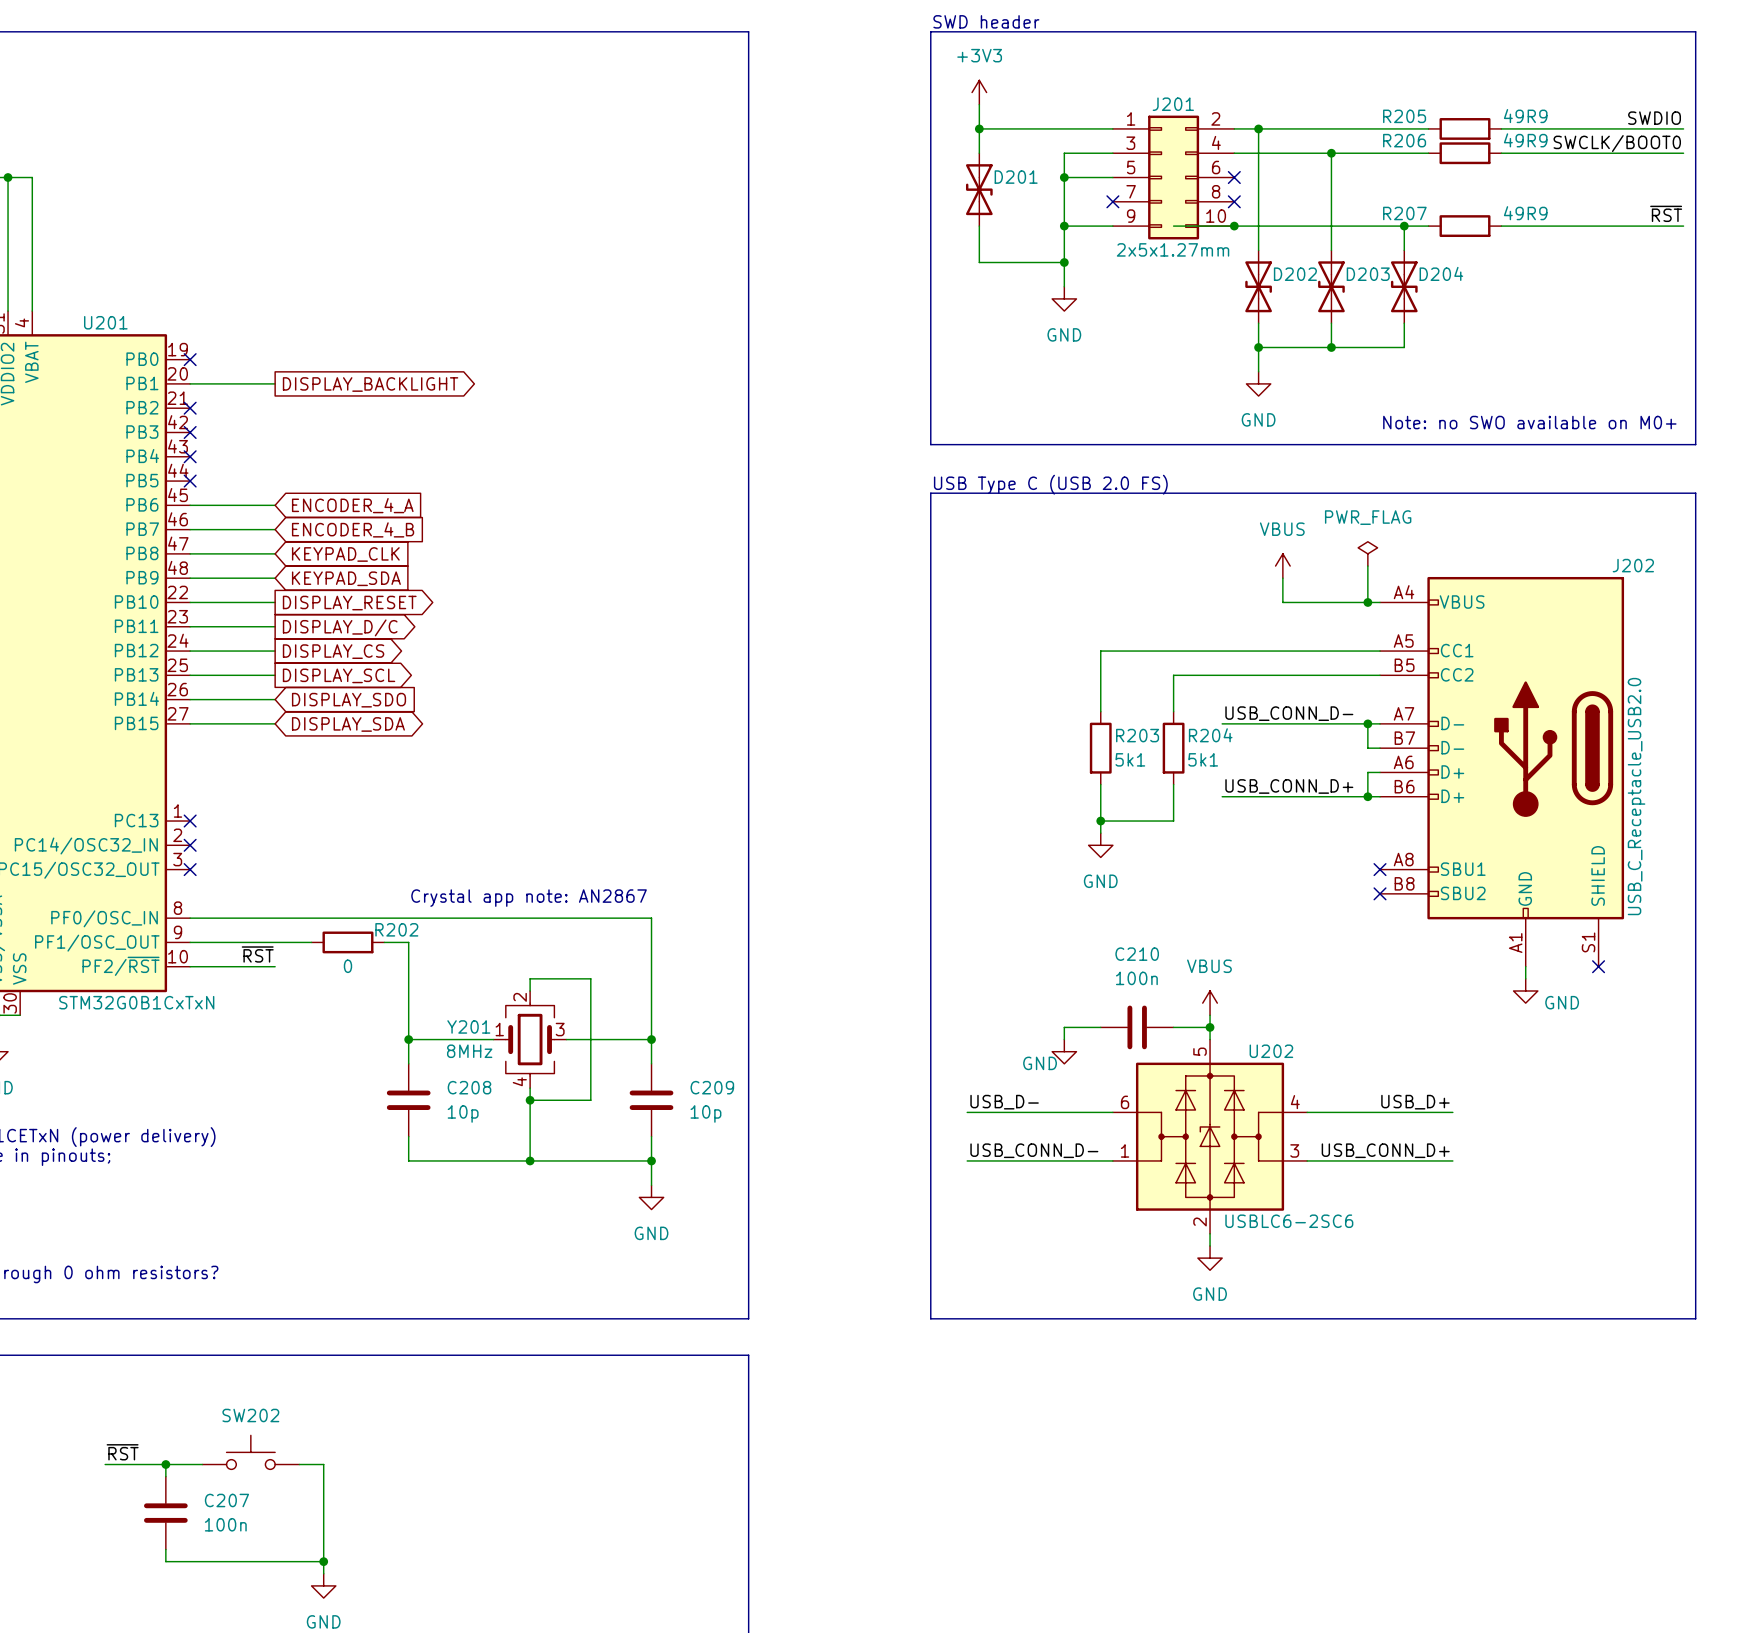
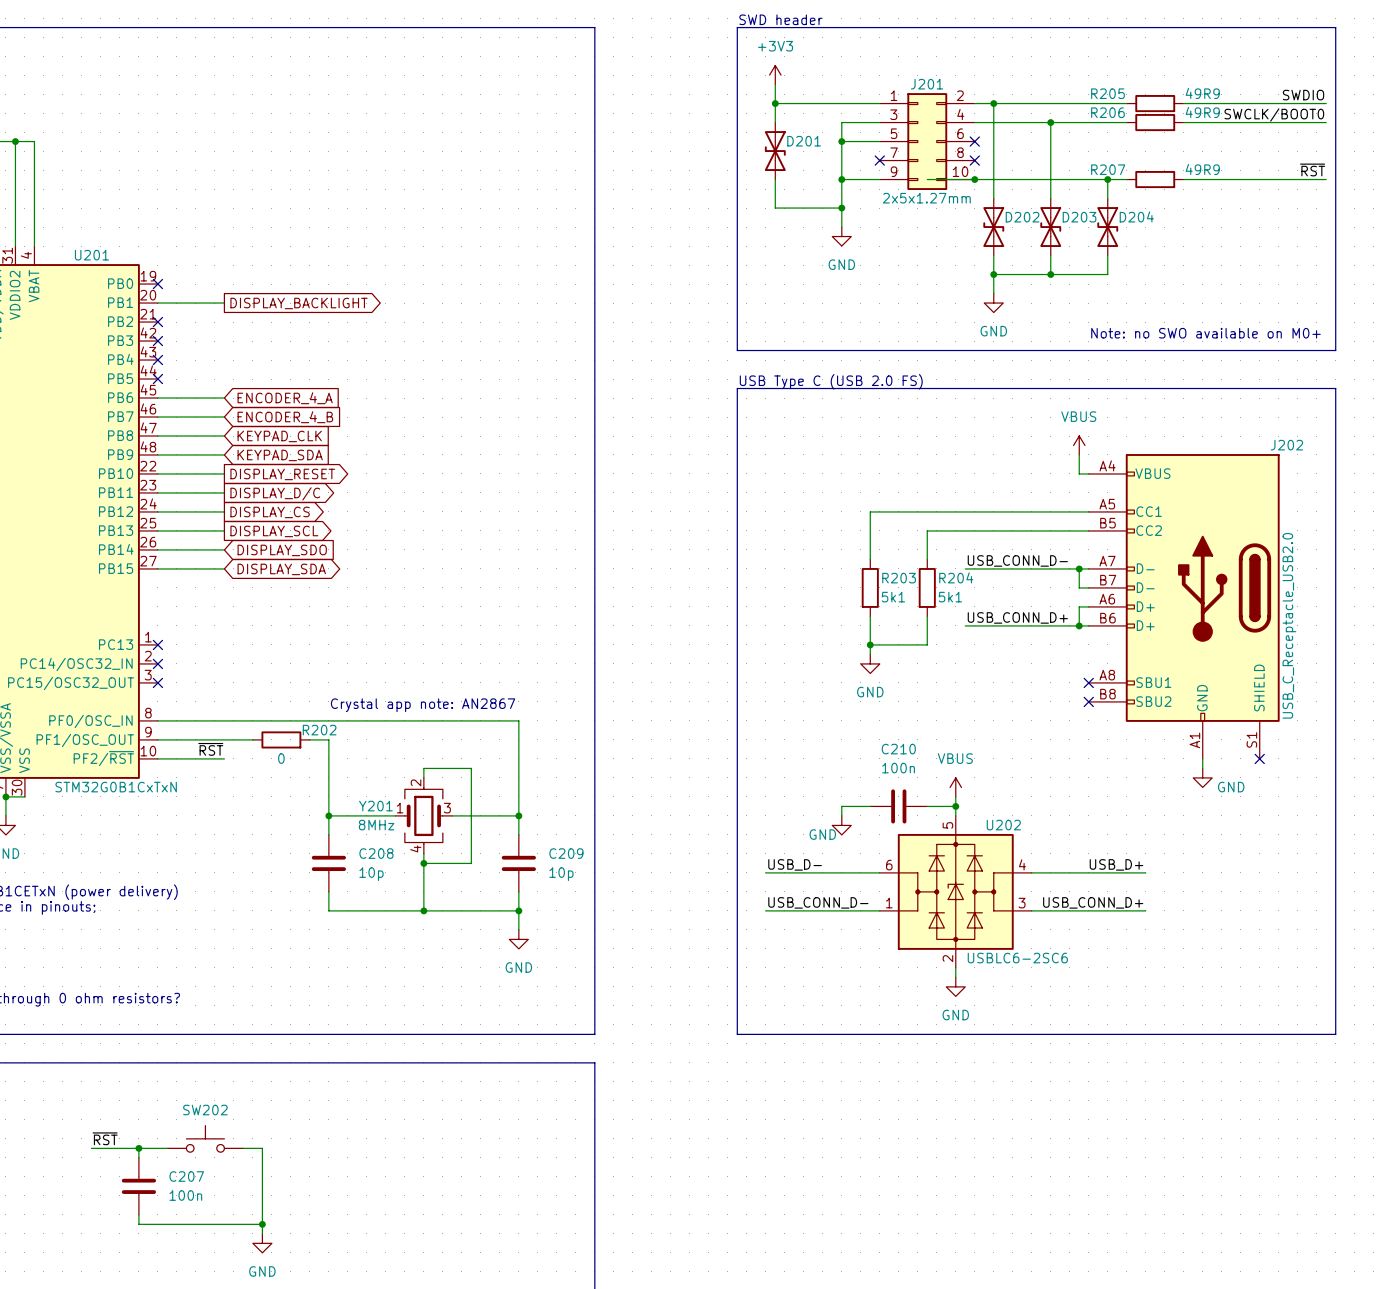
power symbol: PWR_FLAG (1367, 553) -> none
power symbol position: VBUS (1282, 566) -> VBUS (1079, 445)
wire: (1282, 578) (1282, 602) (1367, 602) -> none
junction: (1367, 602) -> none

